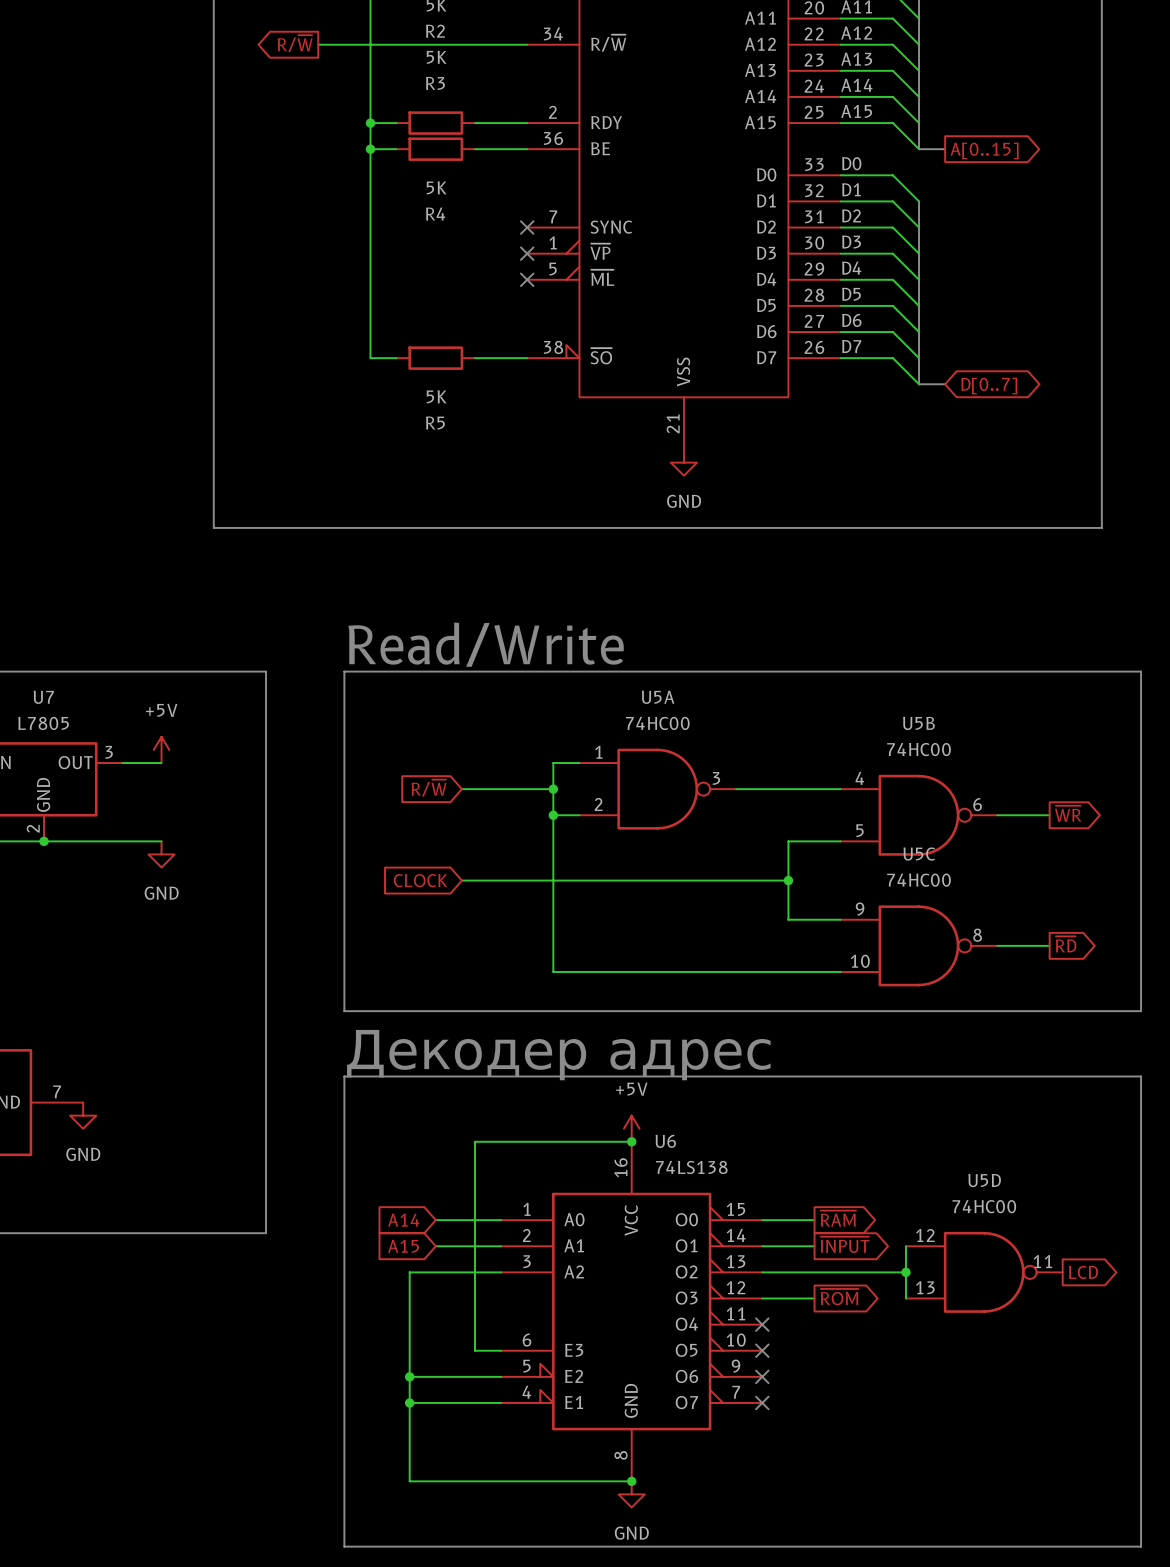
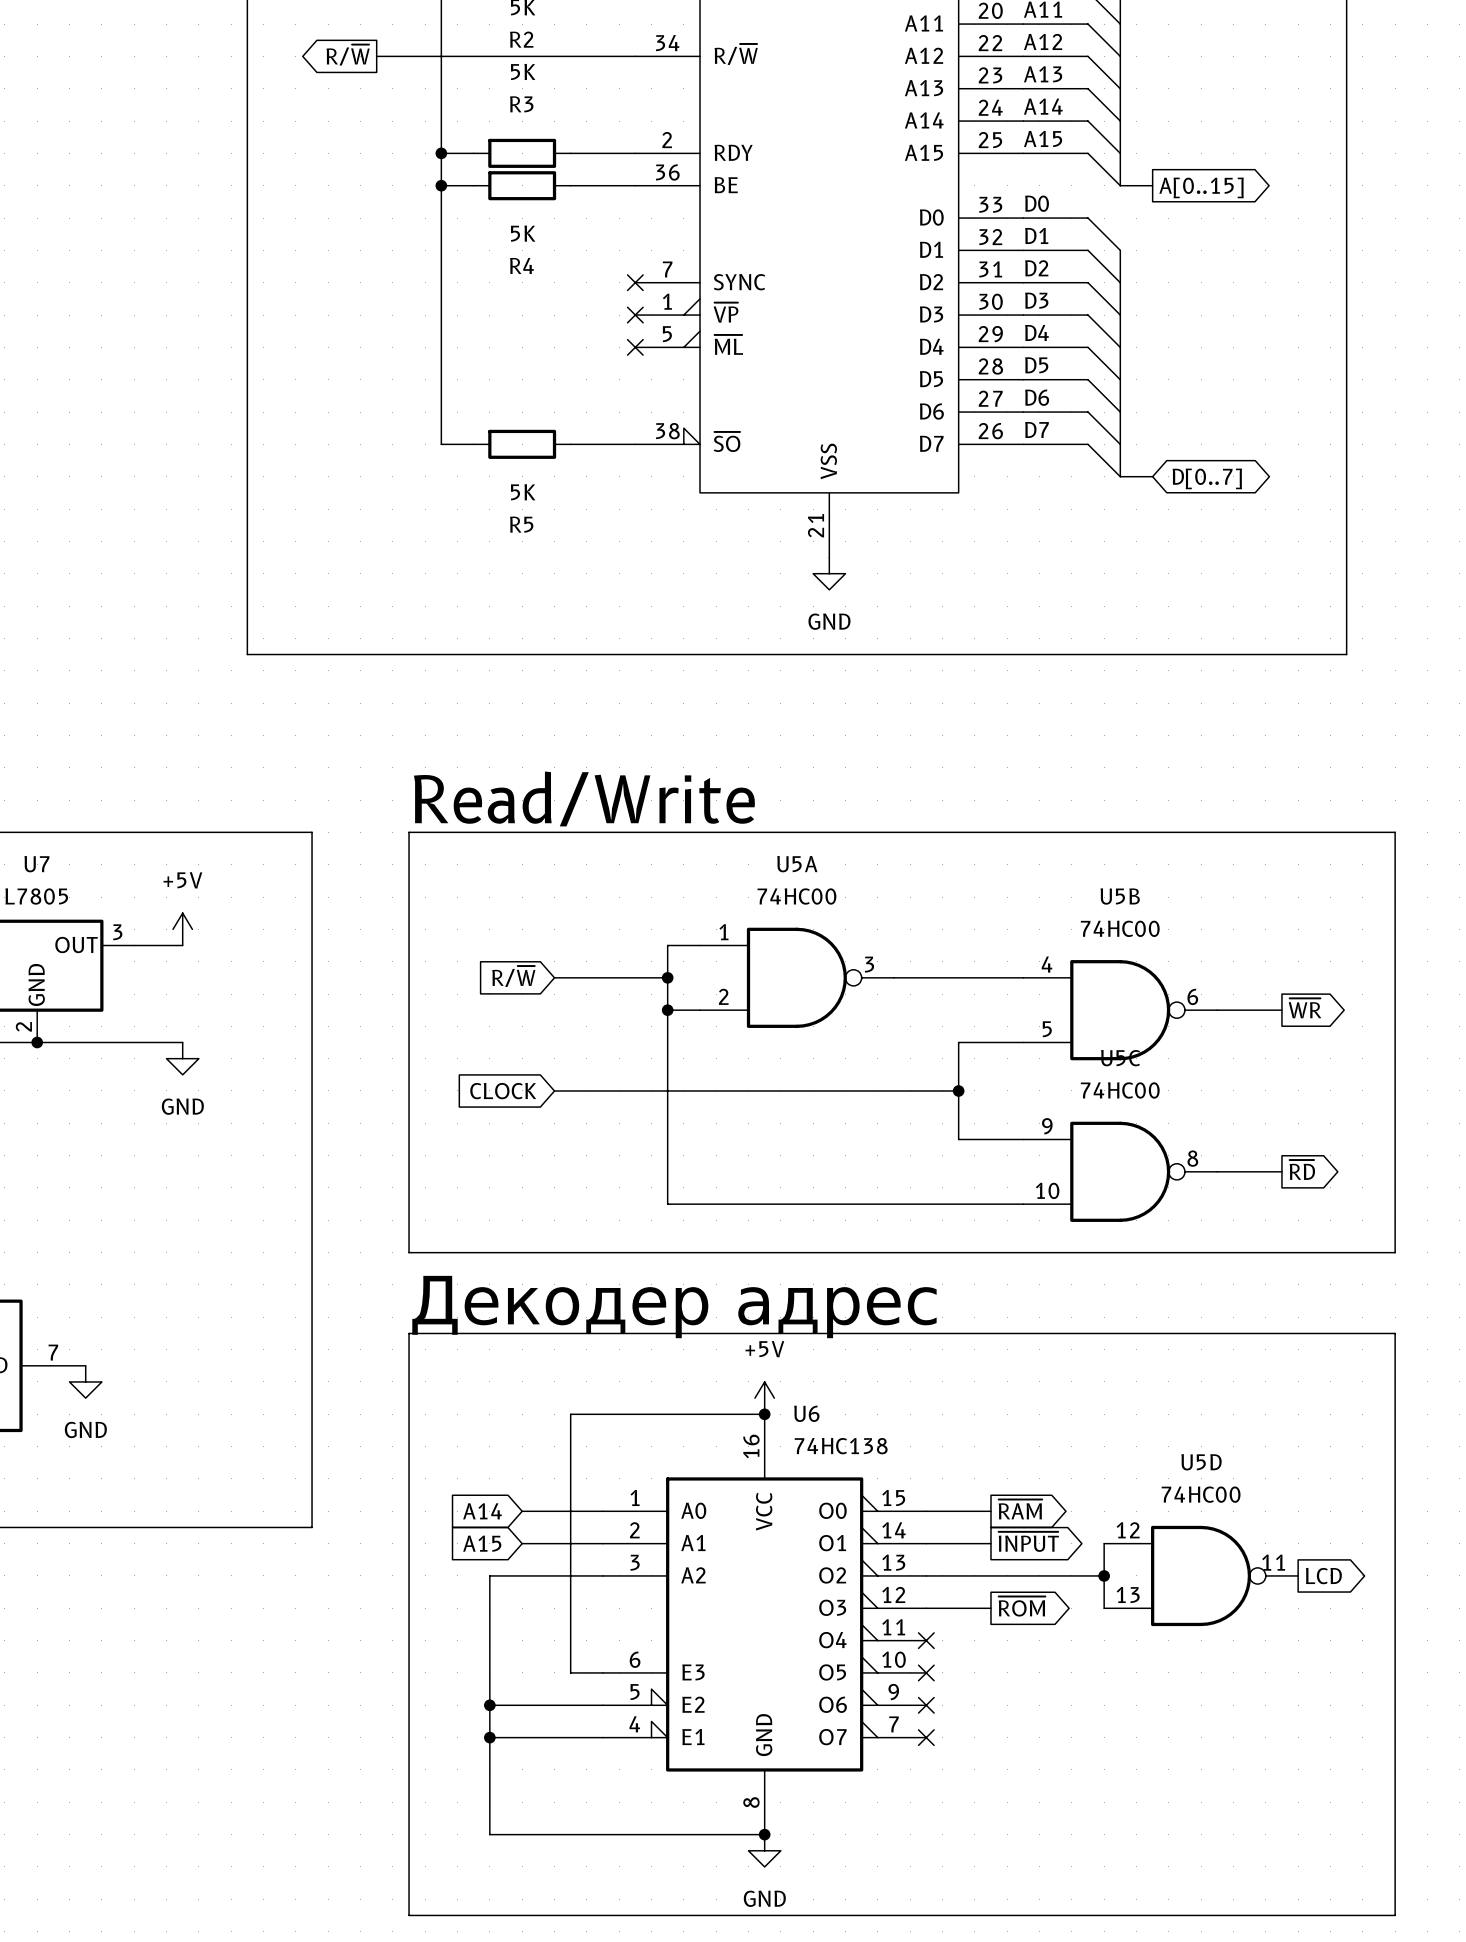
U6 value: 74LS138 (691, 1167) -> 74HC138 (841, 1446)

